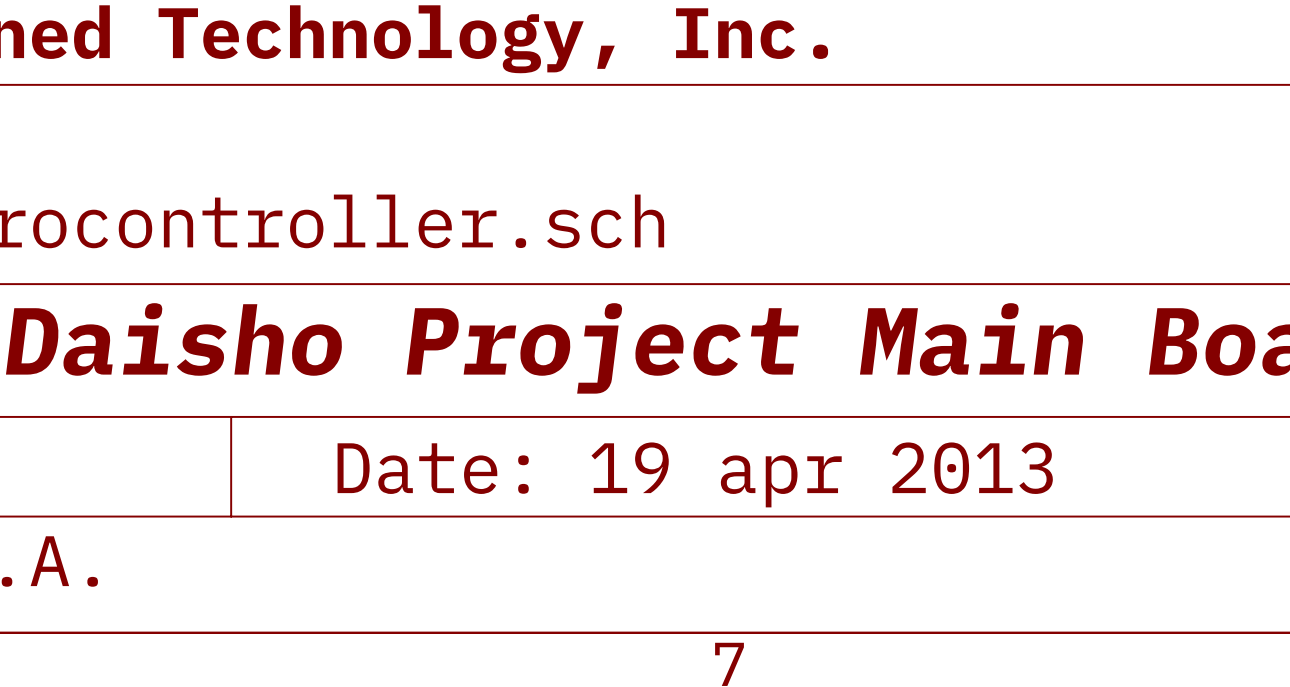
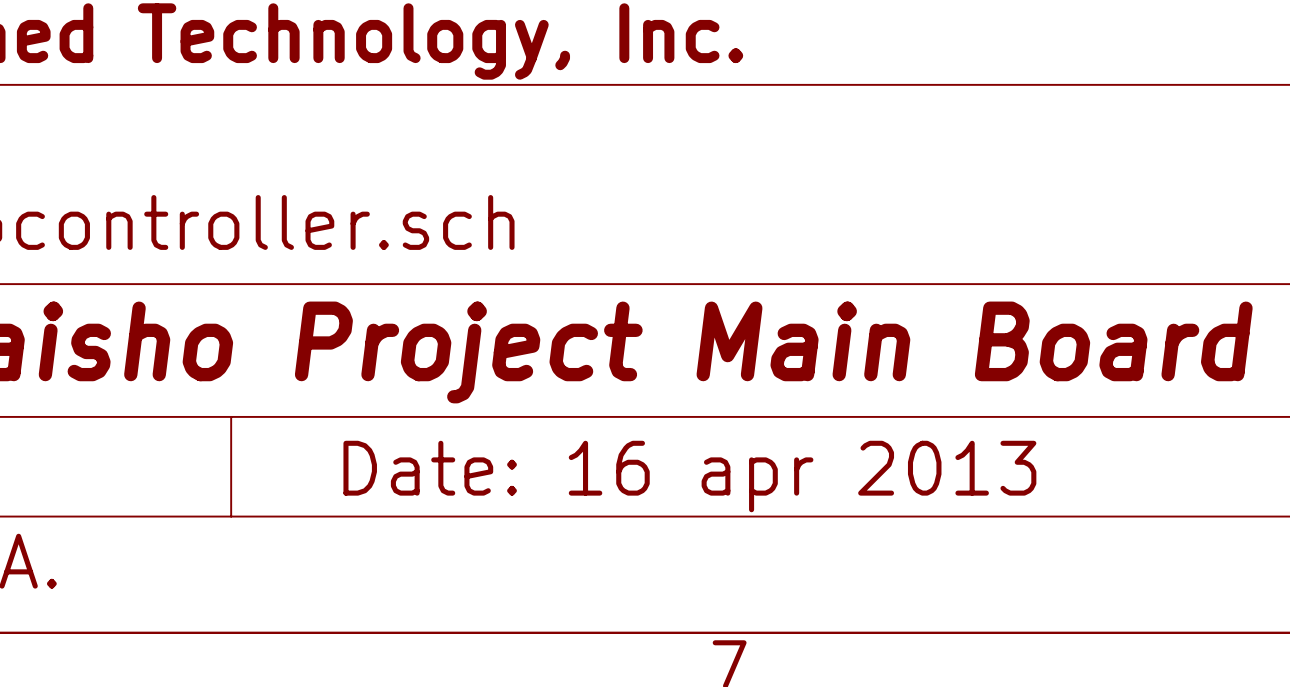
title block: Date: 19 apr 2013 (695, 474) -> Date: 16 apr 2013 (689, 476)

